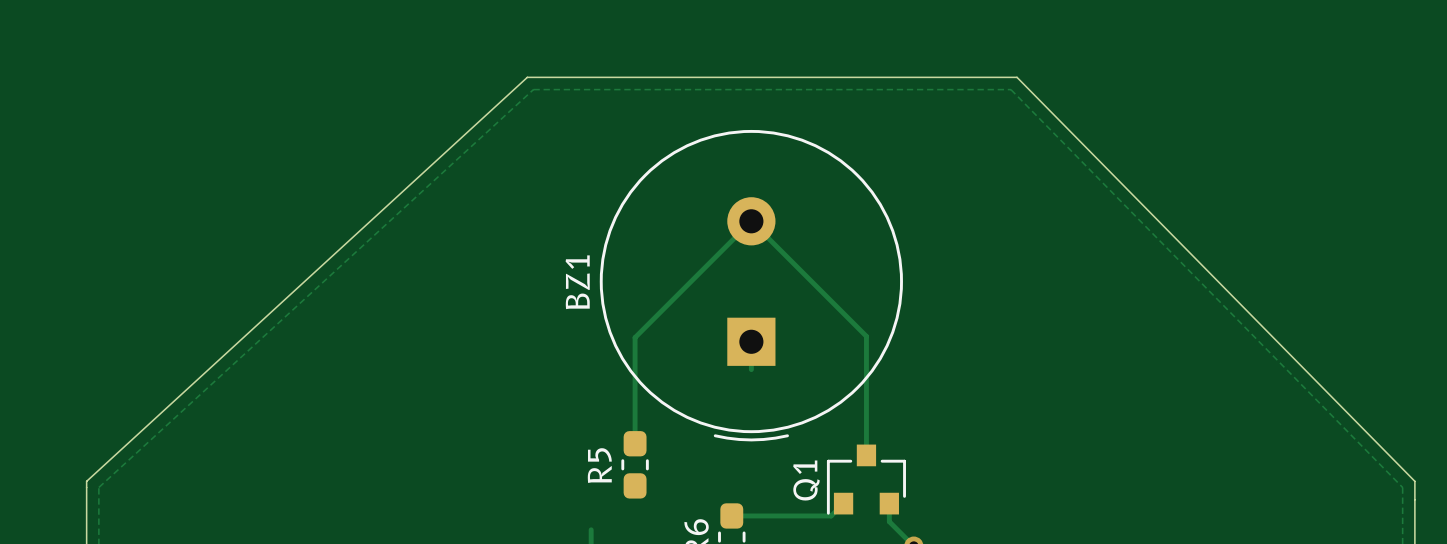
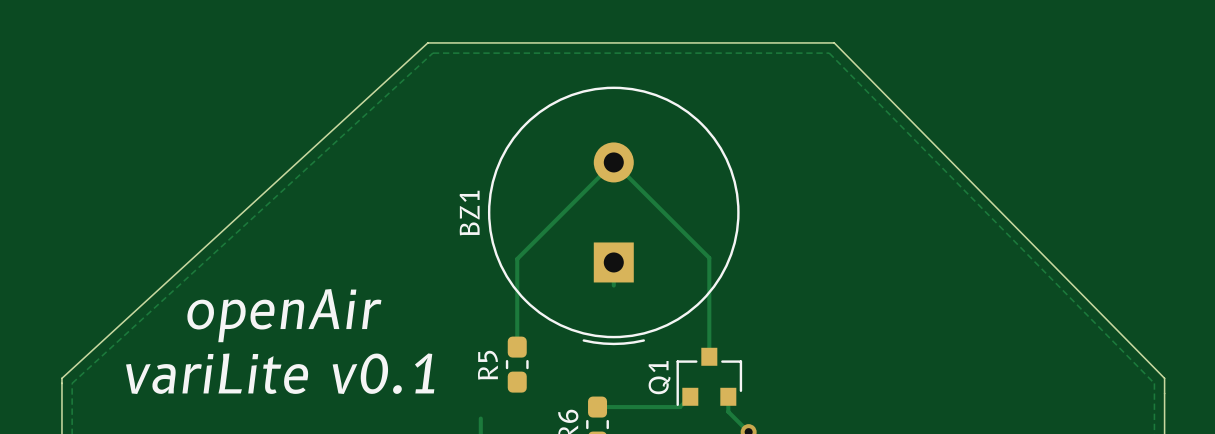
text: none -> openAir (284, 315)
text: none -> variLite v0.1 (280, 373)

